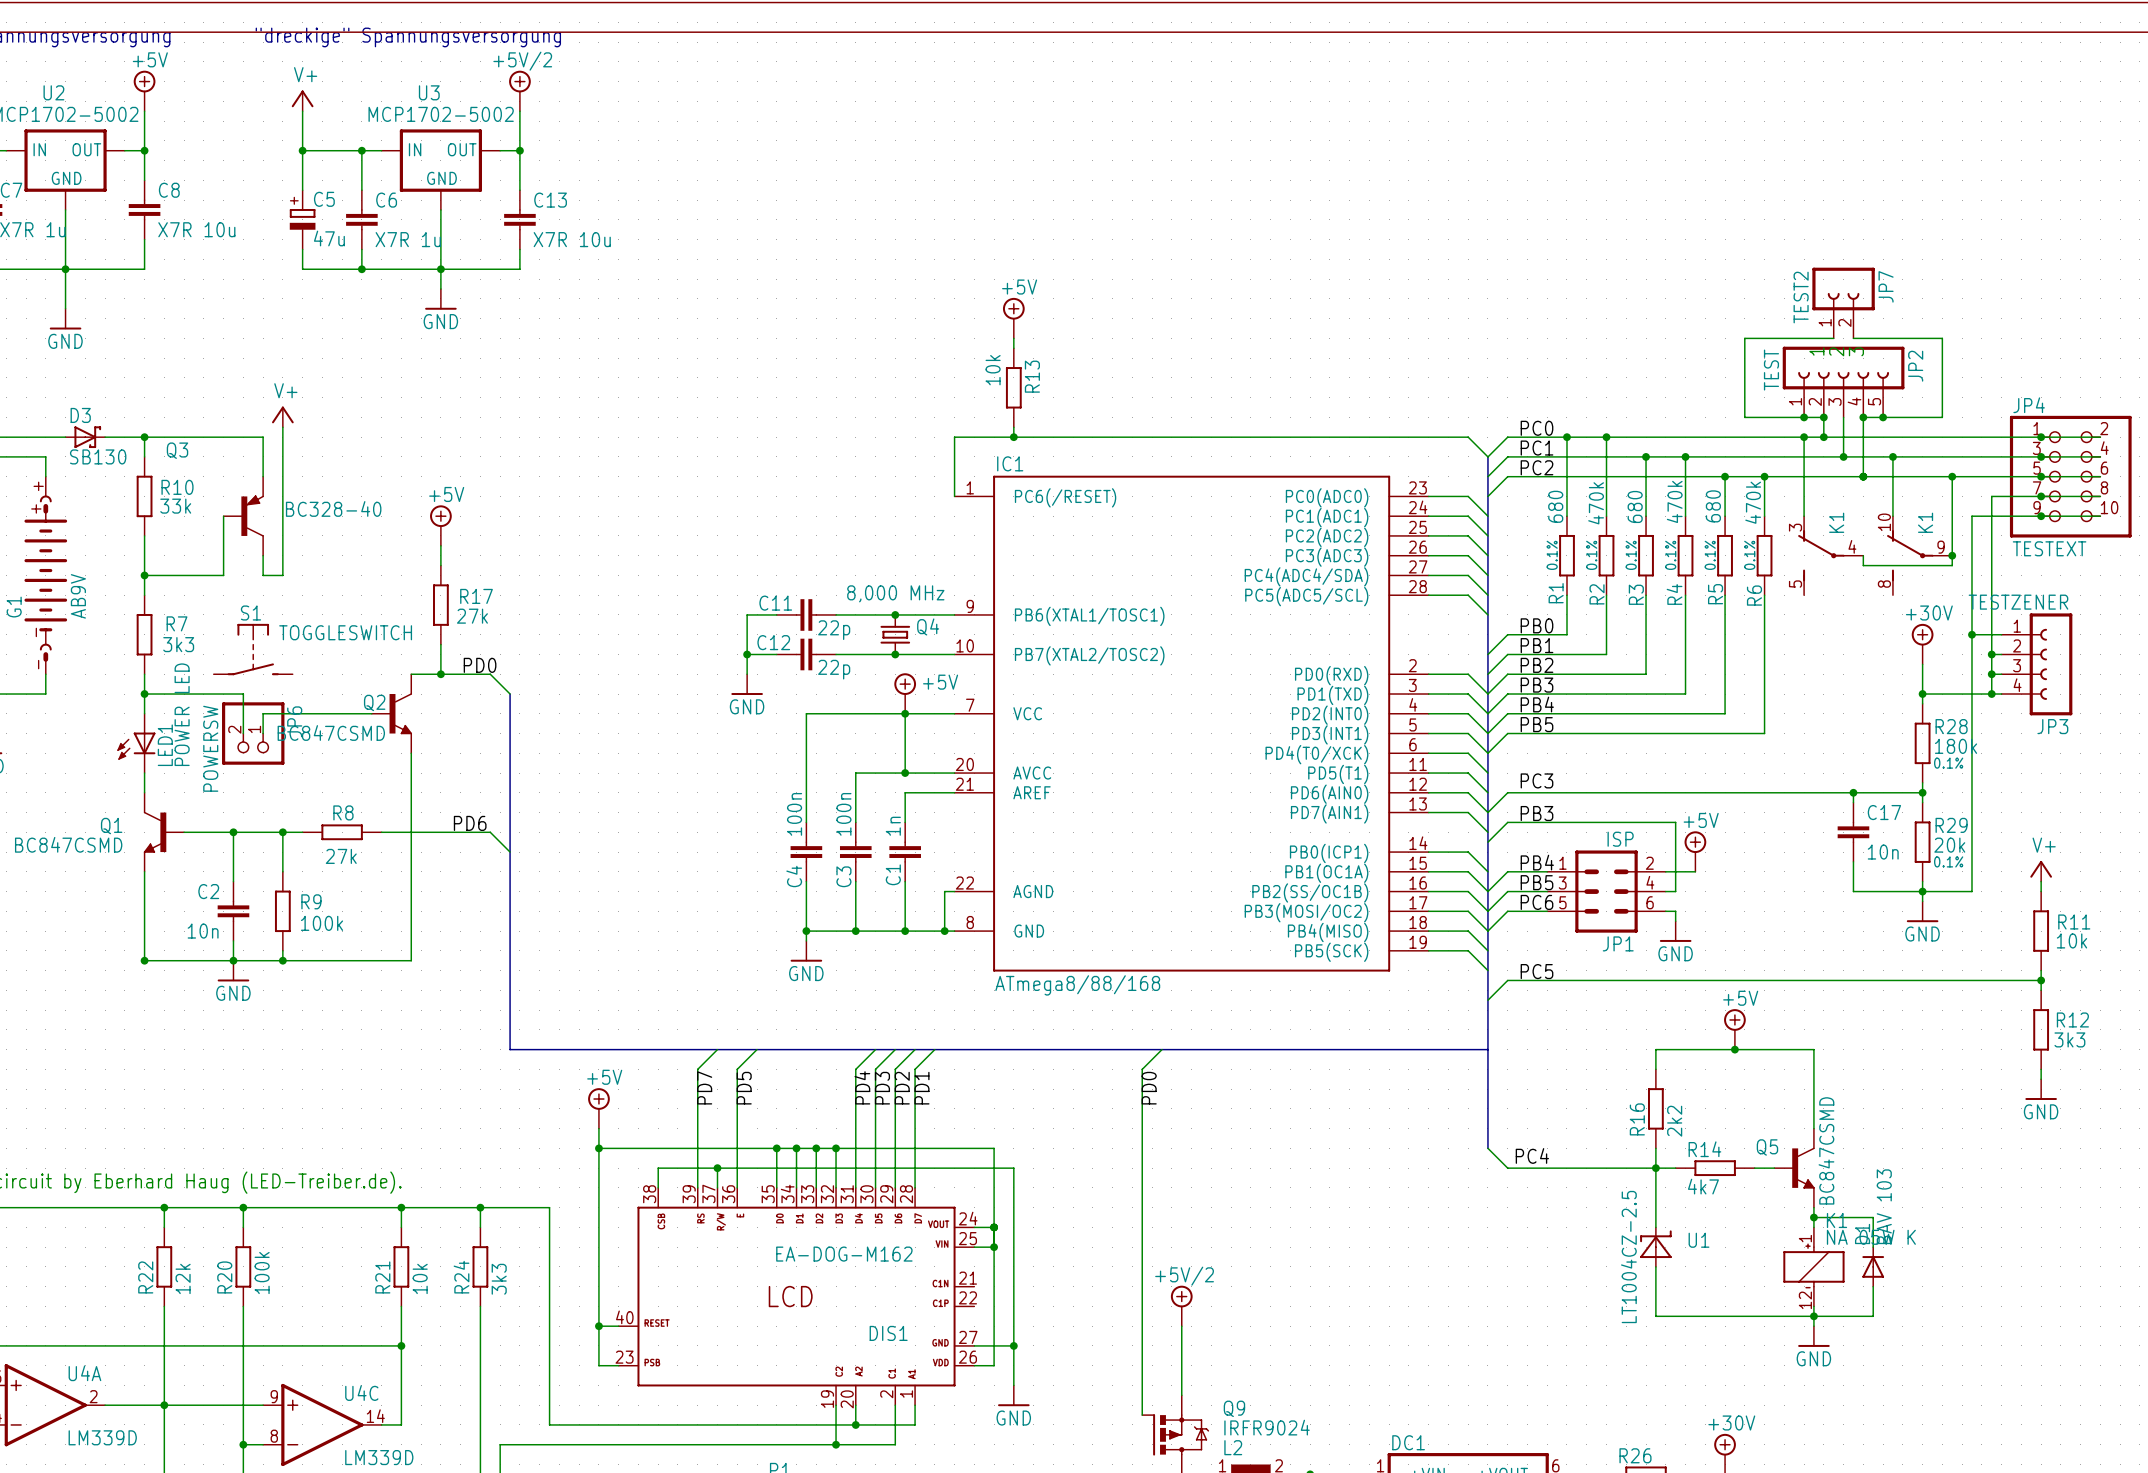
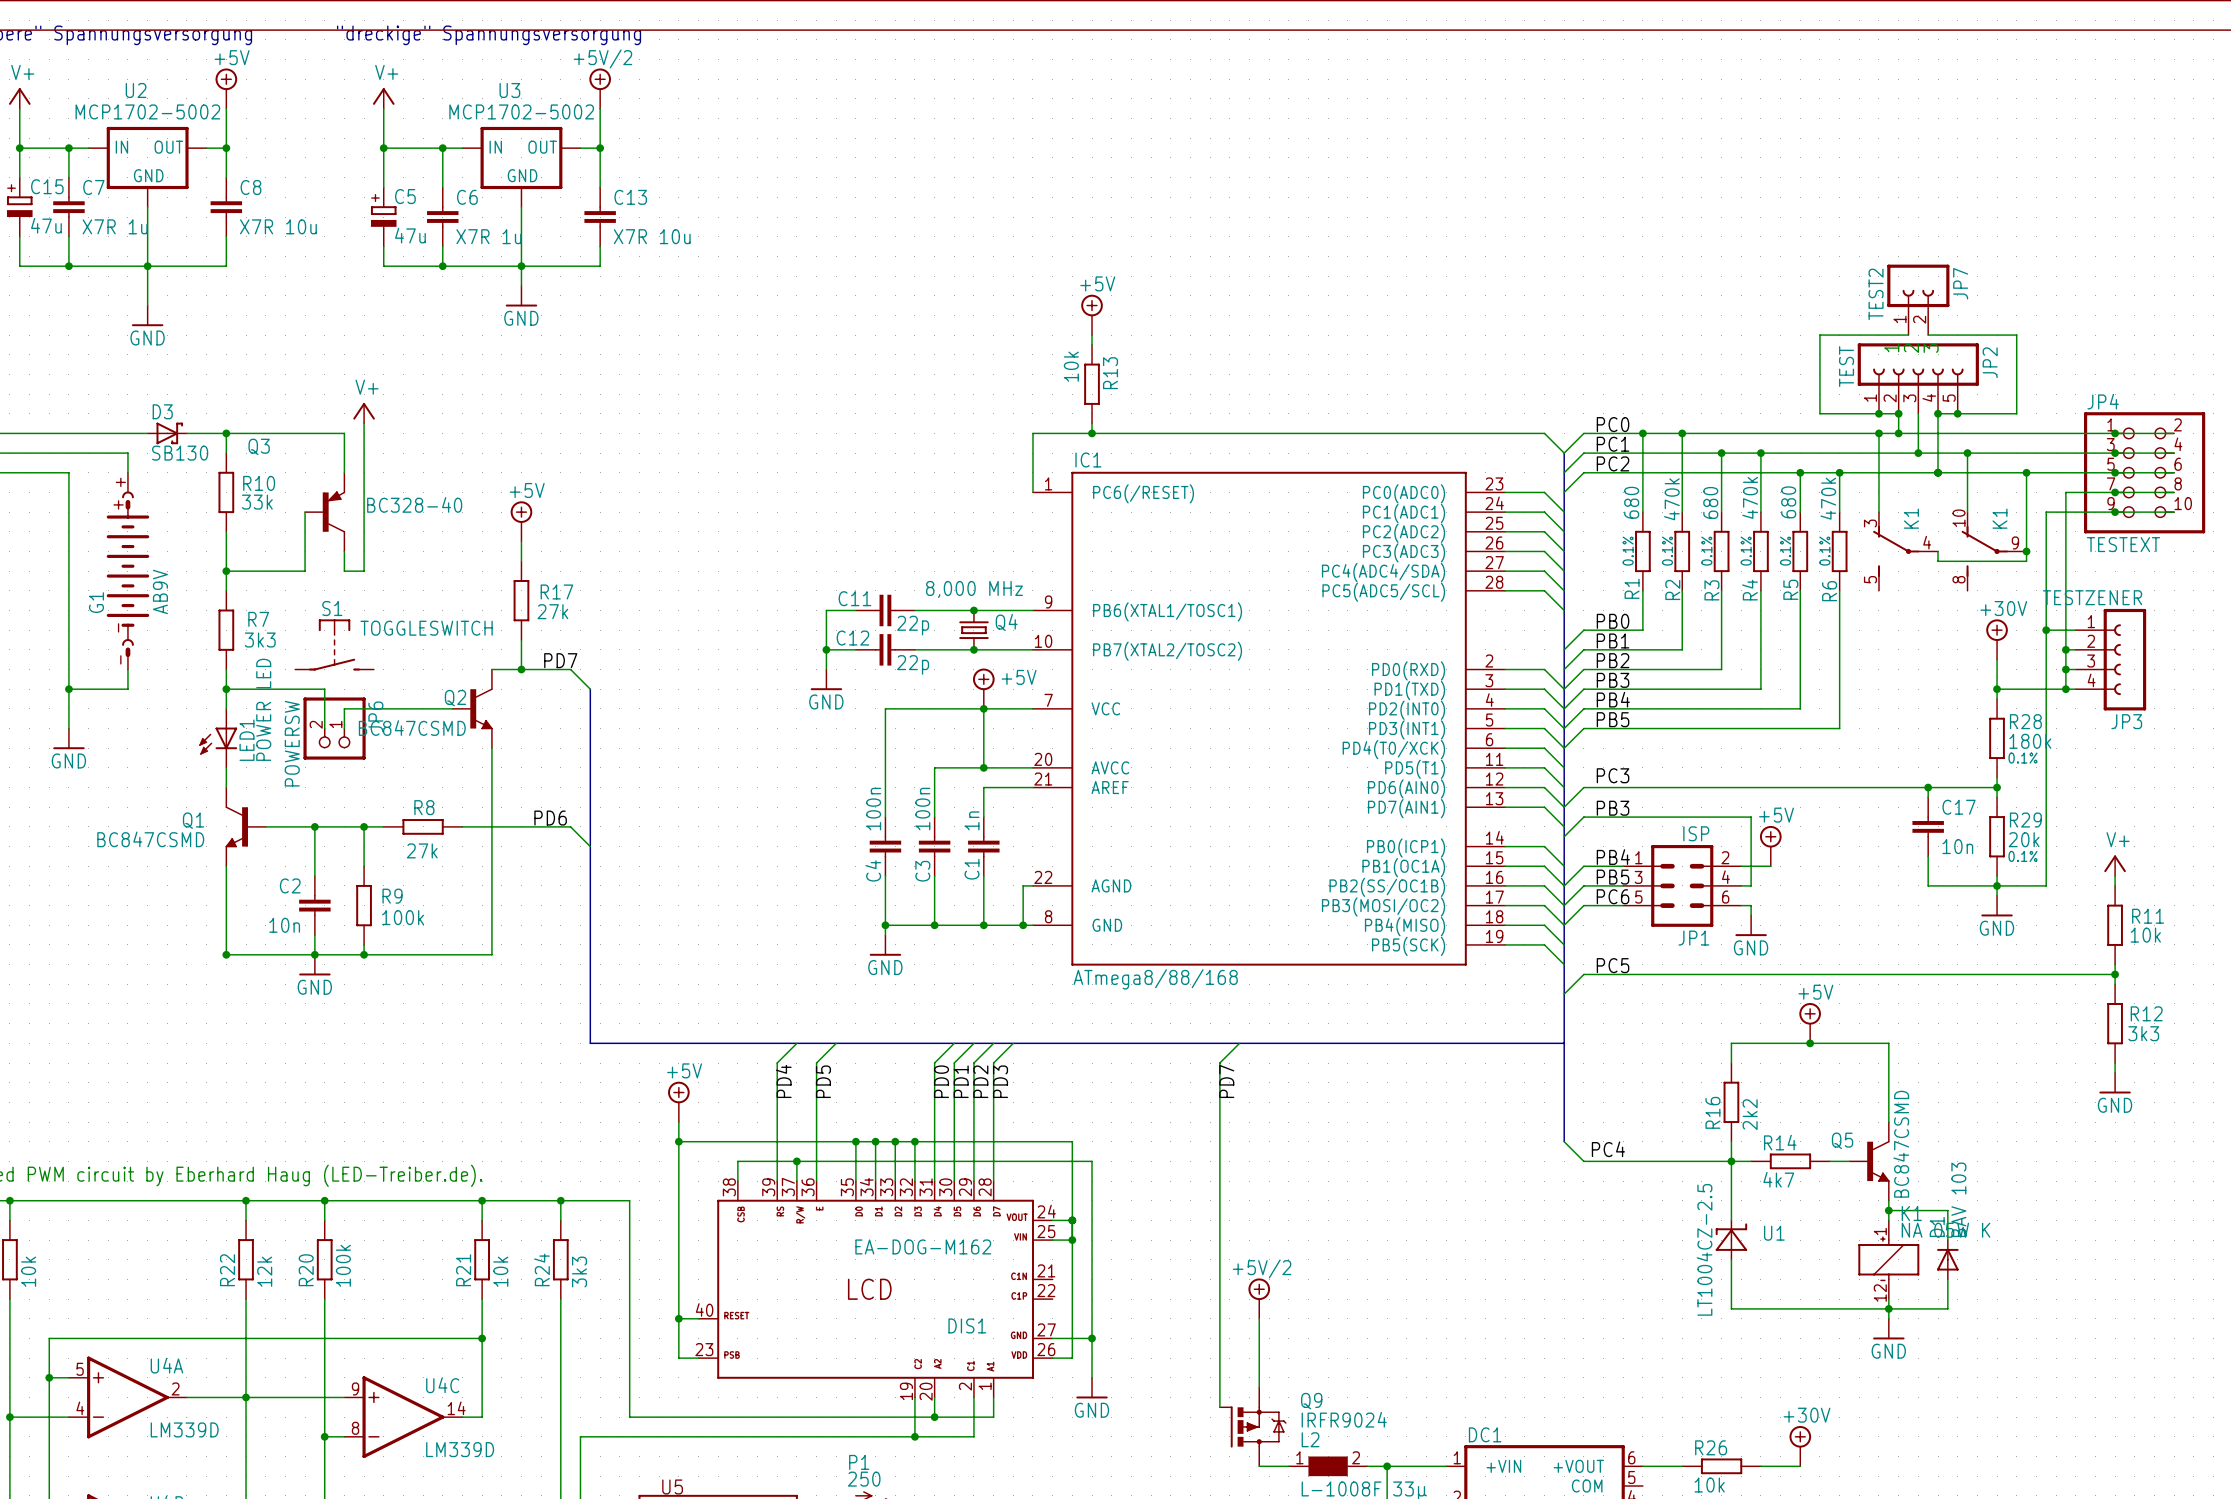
label: PD0 (480, 665) -> PD7 (560, 660)
label: PD7 (704, 1087) -> PD4 (783, 1081)
label: PD4 (862, 1087) -> PD0 (941, 1081)
label: PD3 (882, 1088) -> PD1 (961, 1081)
label: PD1 (921, 1088) -> PD3 (1000, 1081)
label: PD0 (1149, 1088) -> PD7 (1226, 1081)

